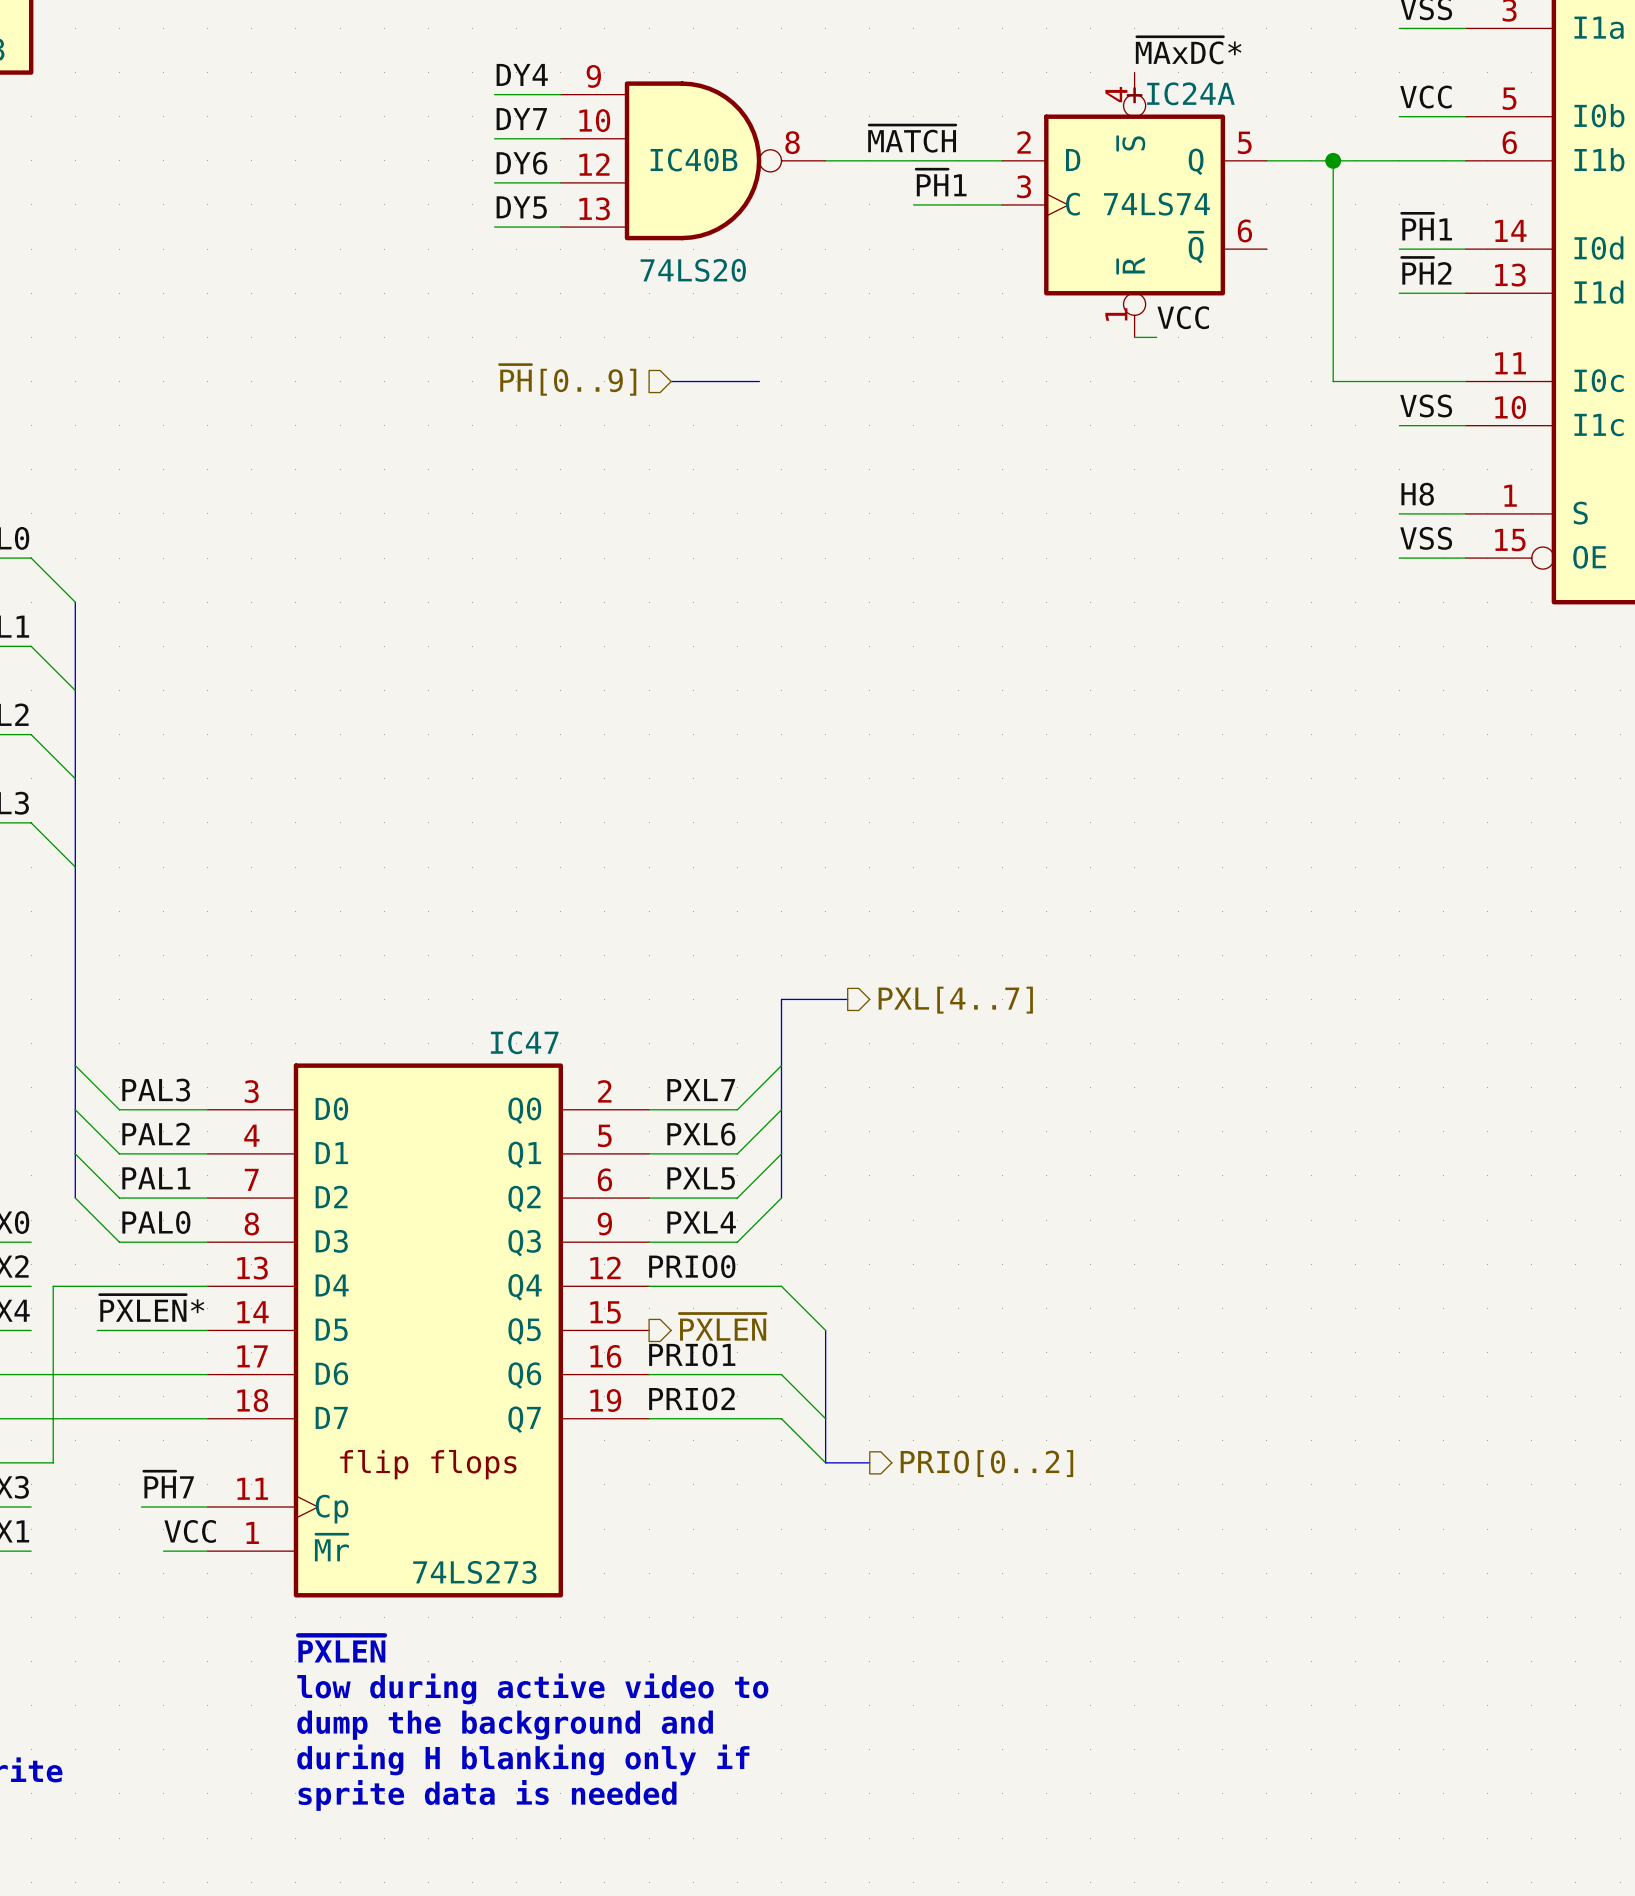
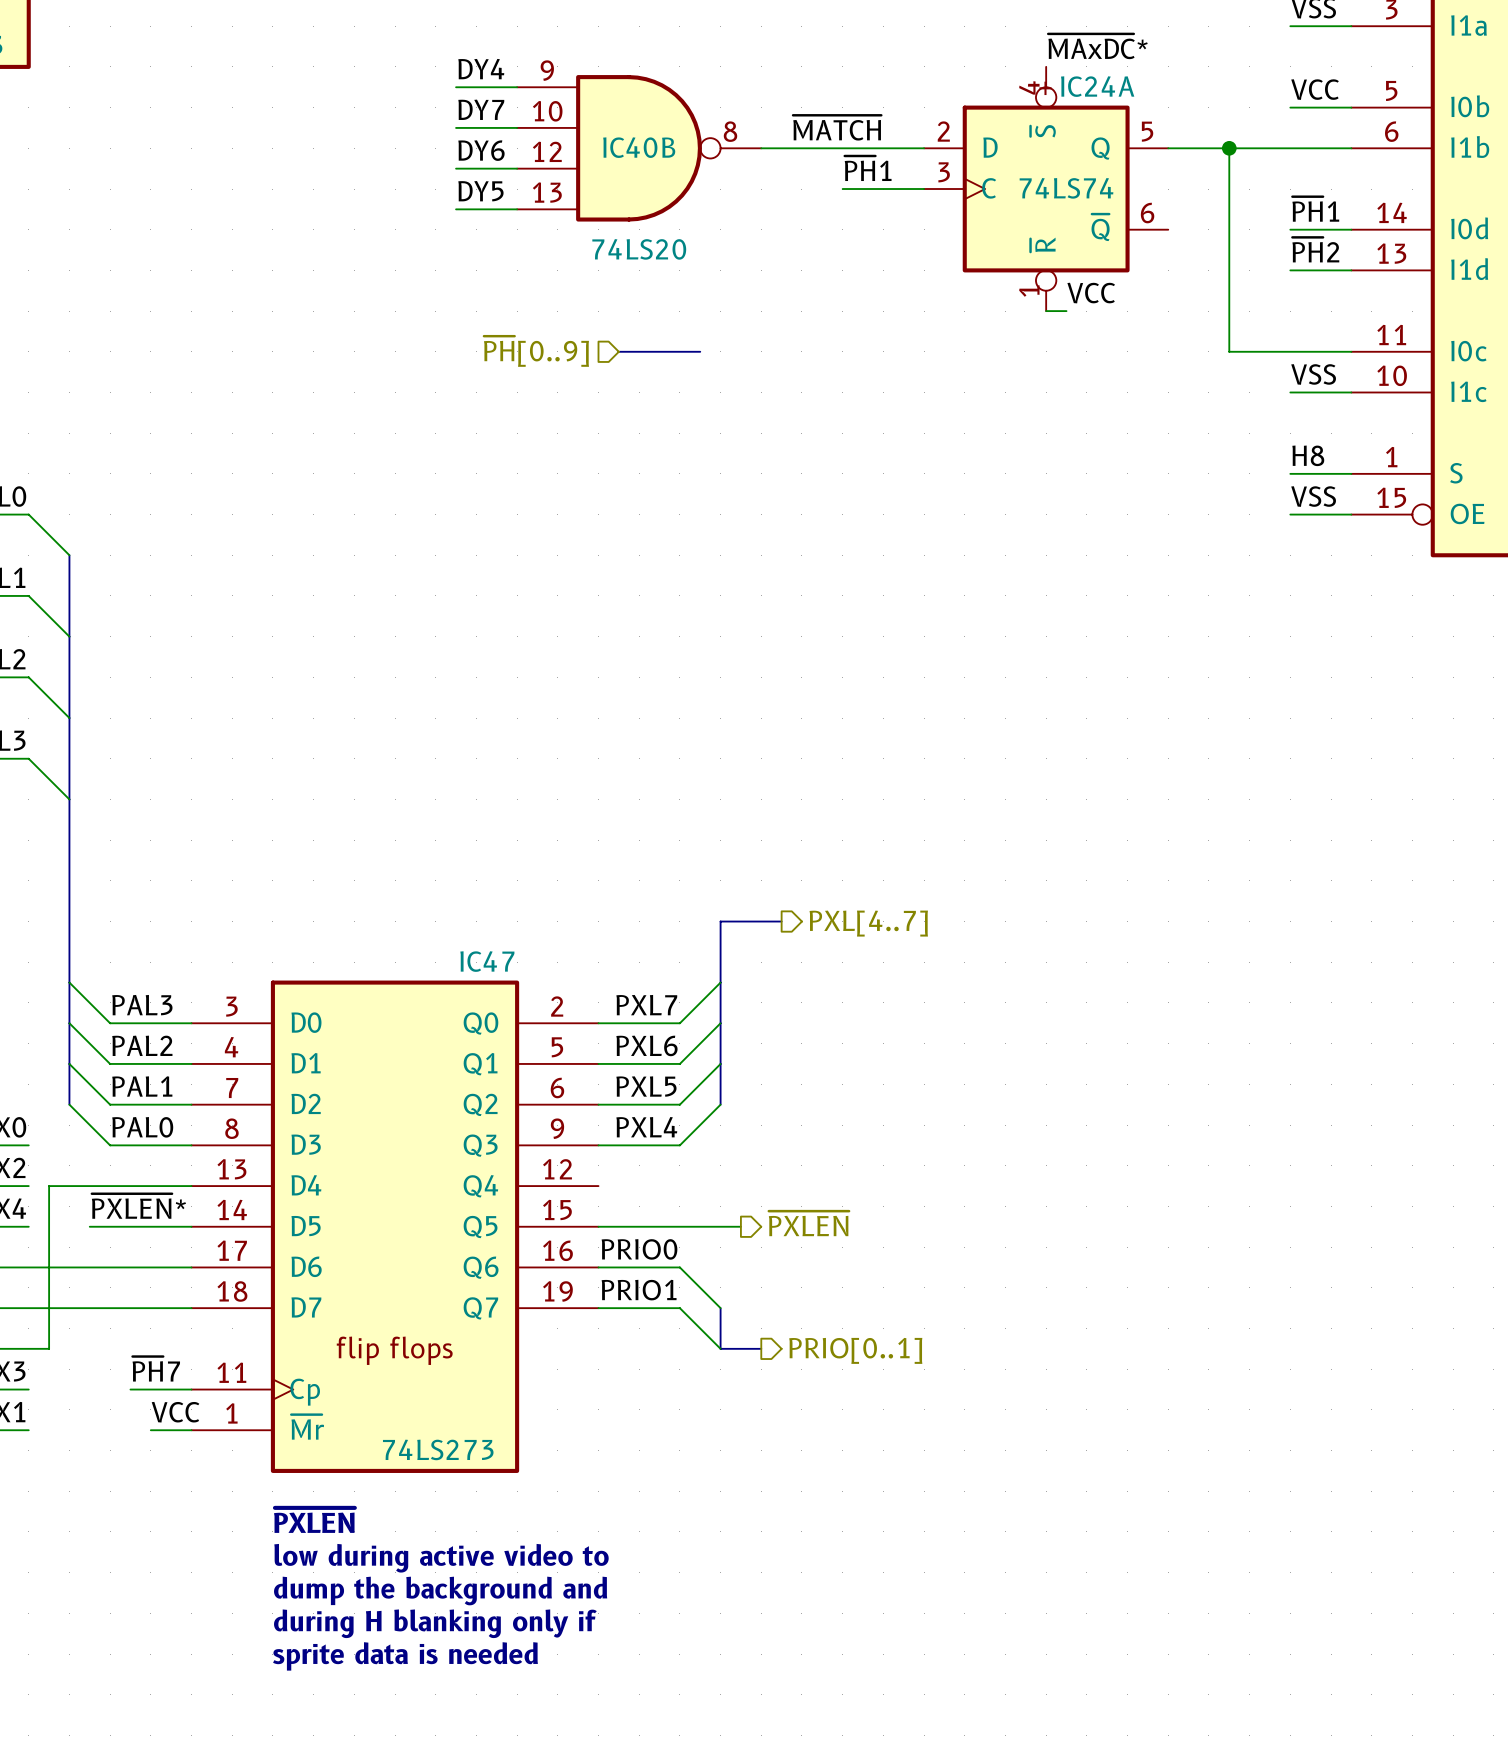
label: PRIO0 (692, 1266) -> none
wire: (649, 1286) (781, 1286) (825, 1330) -> none
hierarchical label position: ~{PXLEN} (722, 1327) -> ~{PXLEN} (808, 1223)
wire: none -> (598, 1226) (740, 1226)
bus: (825, 1330) (825, 1462) (869, 1462) -> none
label: PRIO1 (692, 1354) -> PRIO0 (639, 1249)
wire: (737, 1374) (781, 1374) (825, 1418) -> (679, 1267) (720, 1308)
label: PRIO2 (691, 1399) -> PRIO1 (639, 1290)
wire: (737, 1418) (781, 1418) (825, 1462) -> (679, 1308) (720, 1348)
bus: none -> (720, 1308) (720, 1348) (761, 1348)
hierarchical label: PRIO[0..2] (986, 1463) -> PRIO[0..1] (855, 1350)

